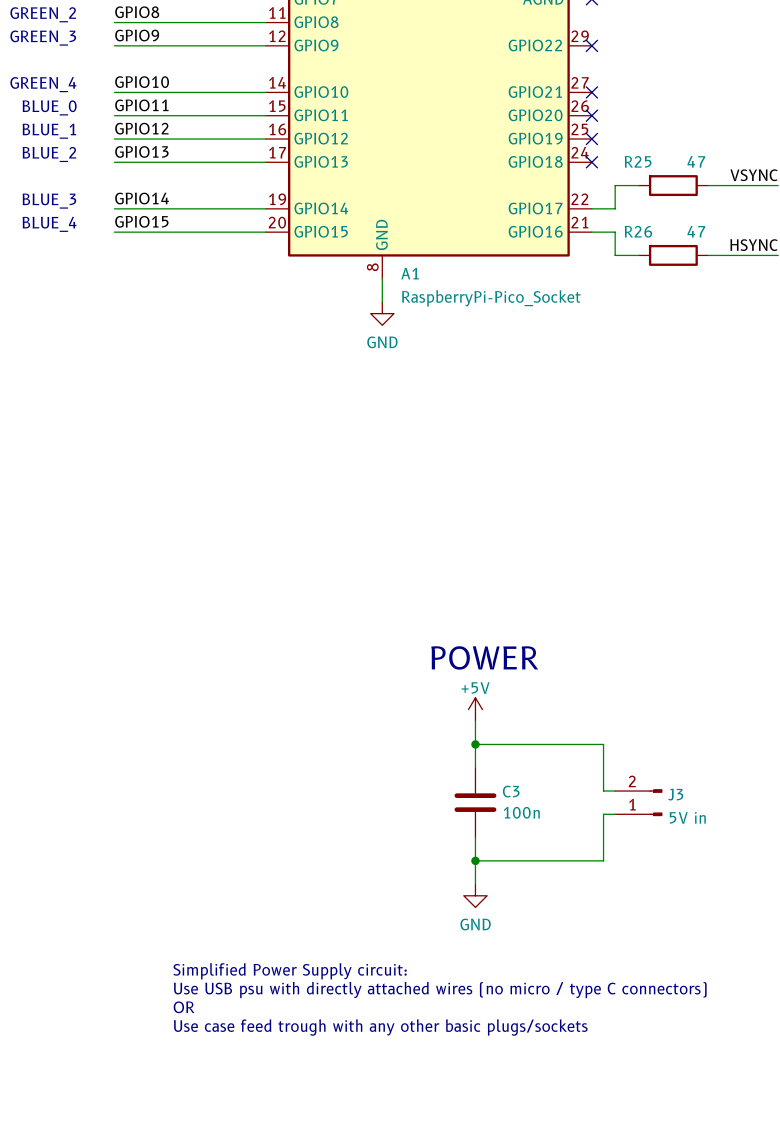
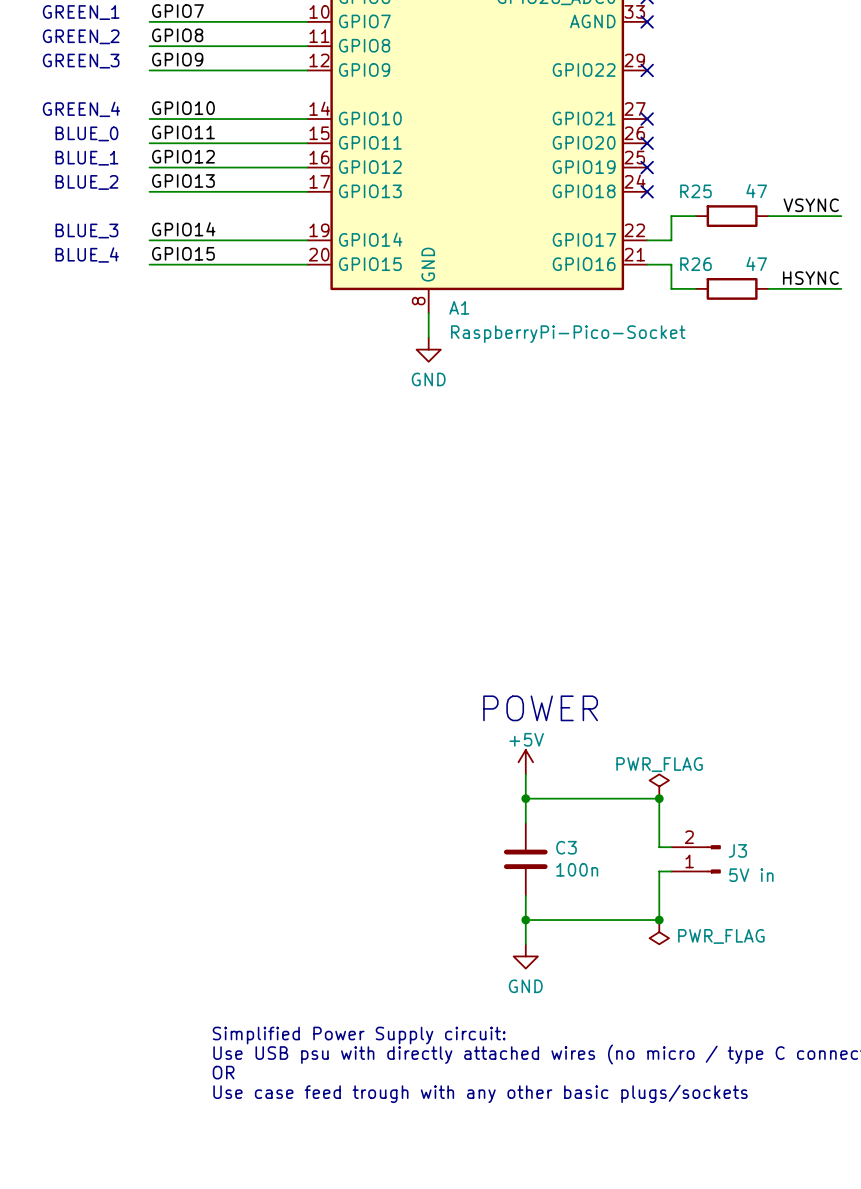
A1 value: RaspberryPi-Pico_Socket (491, 298) -> RaspberryPi-Pico-Socket (568, 334)
power symbol: none -> PWR_FLAG (659, 786)
junction: none -> (659, 798)
junction: none -> (659, 920)
power symbol: none -> PWR_FLAG (659, 932)

